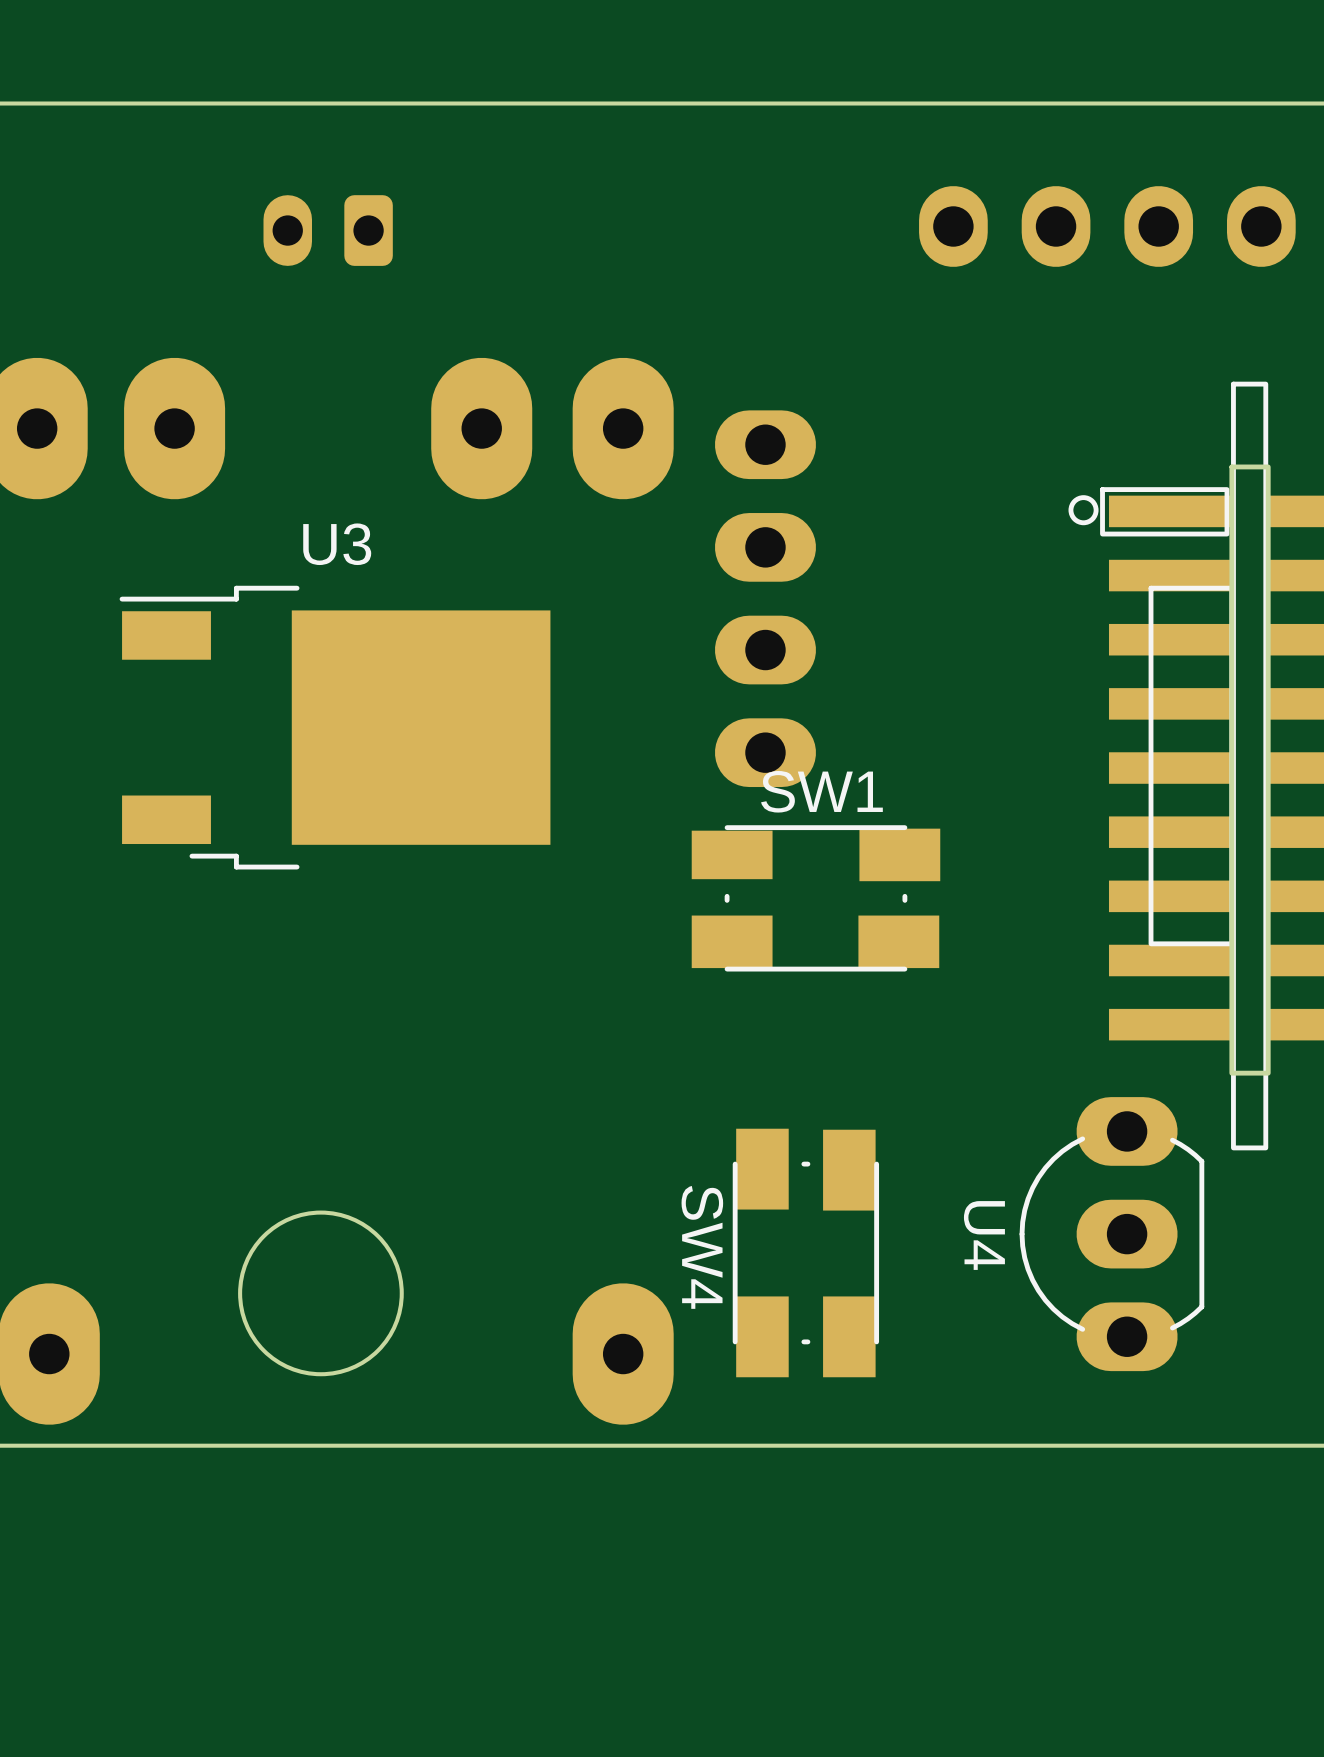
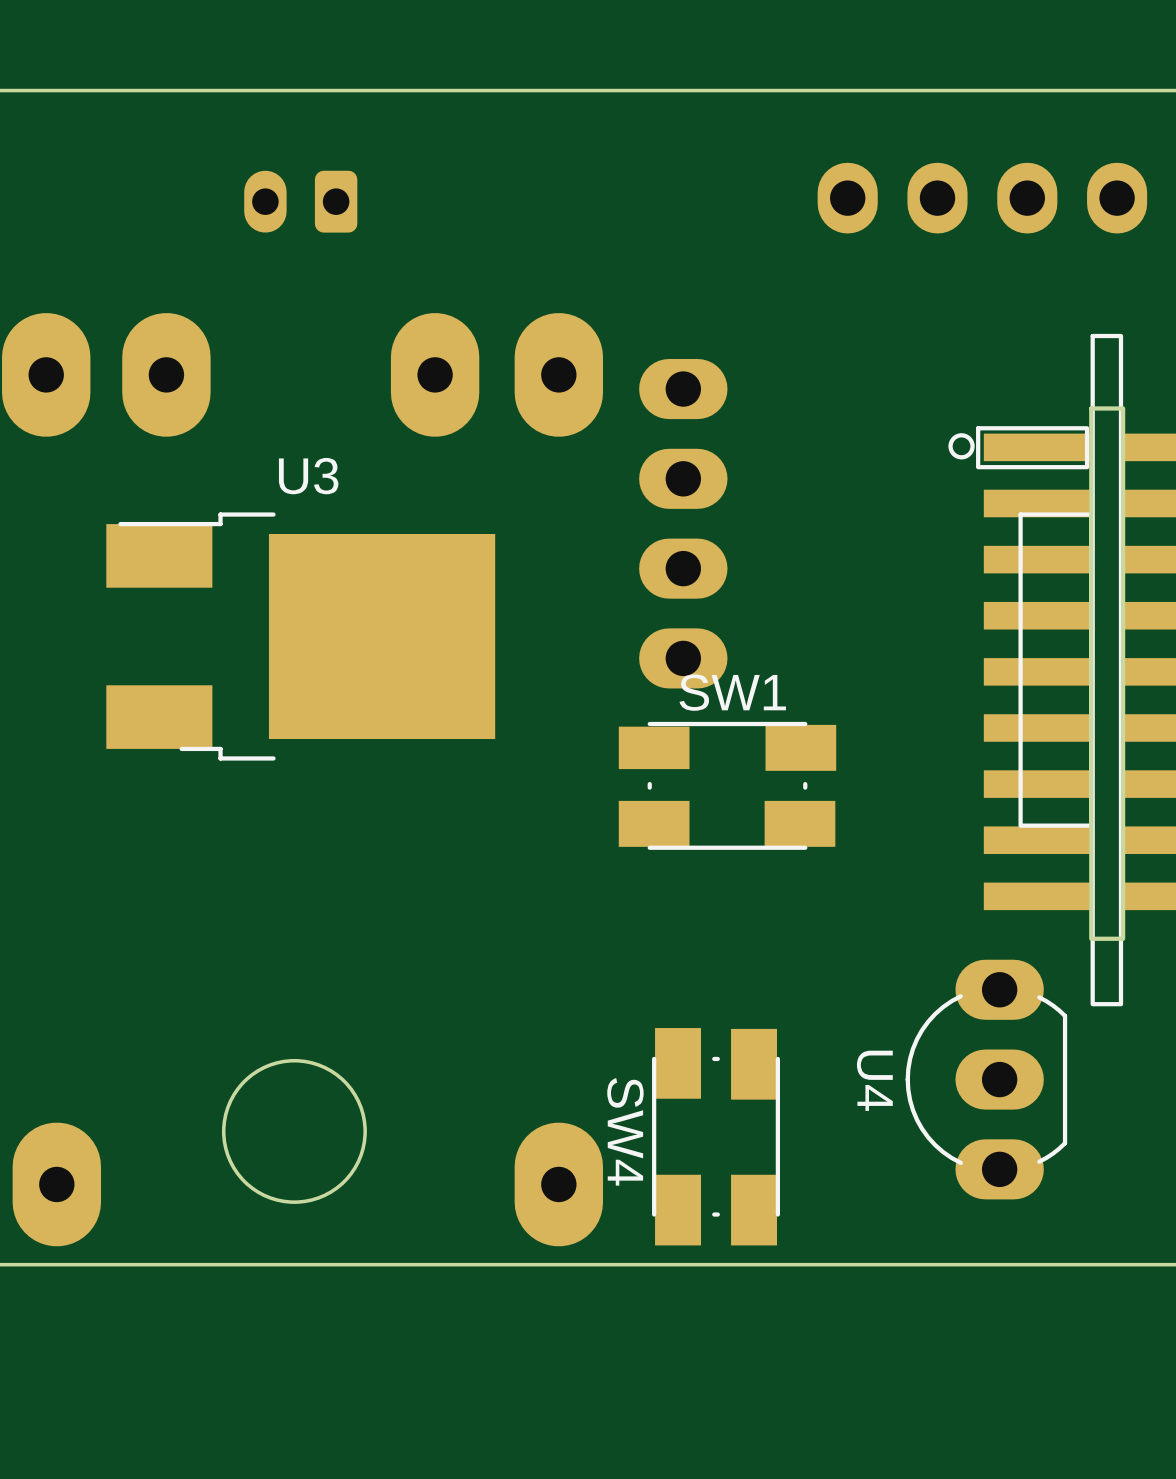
U3 footprint: [119, 585, 551, 870] -> [106, 512, 496, 761]
SW4 position: (805, 1252) -> (716, 1136)

